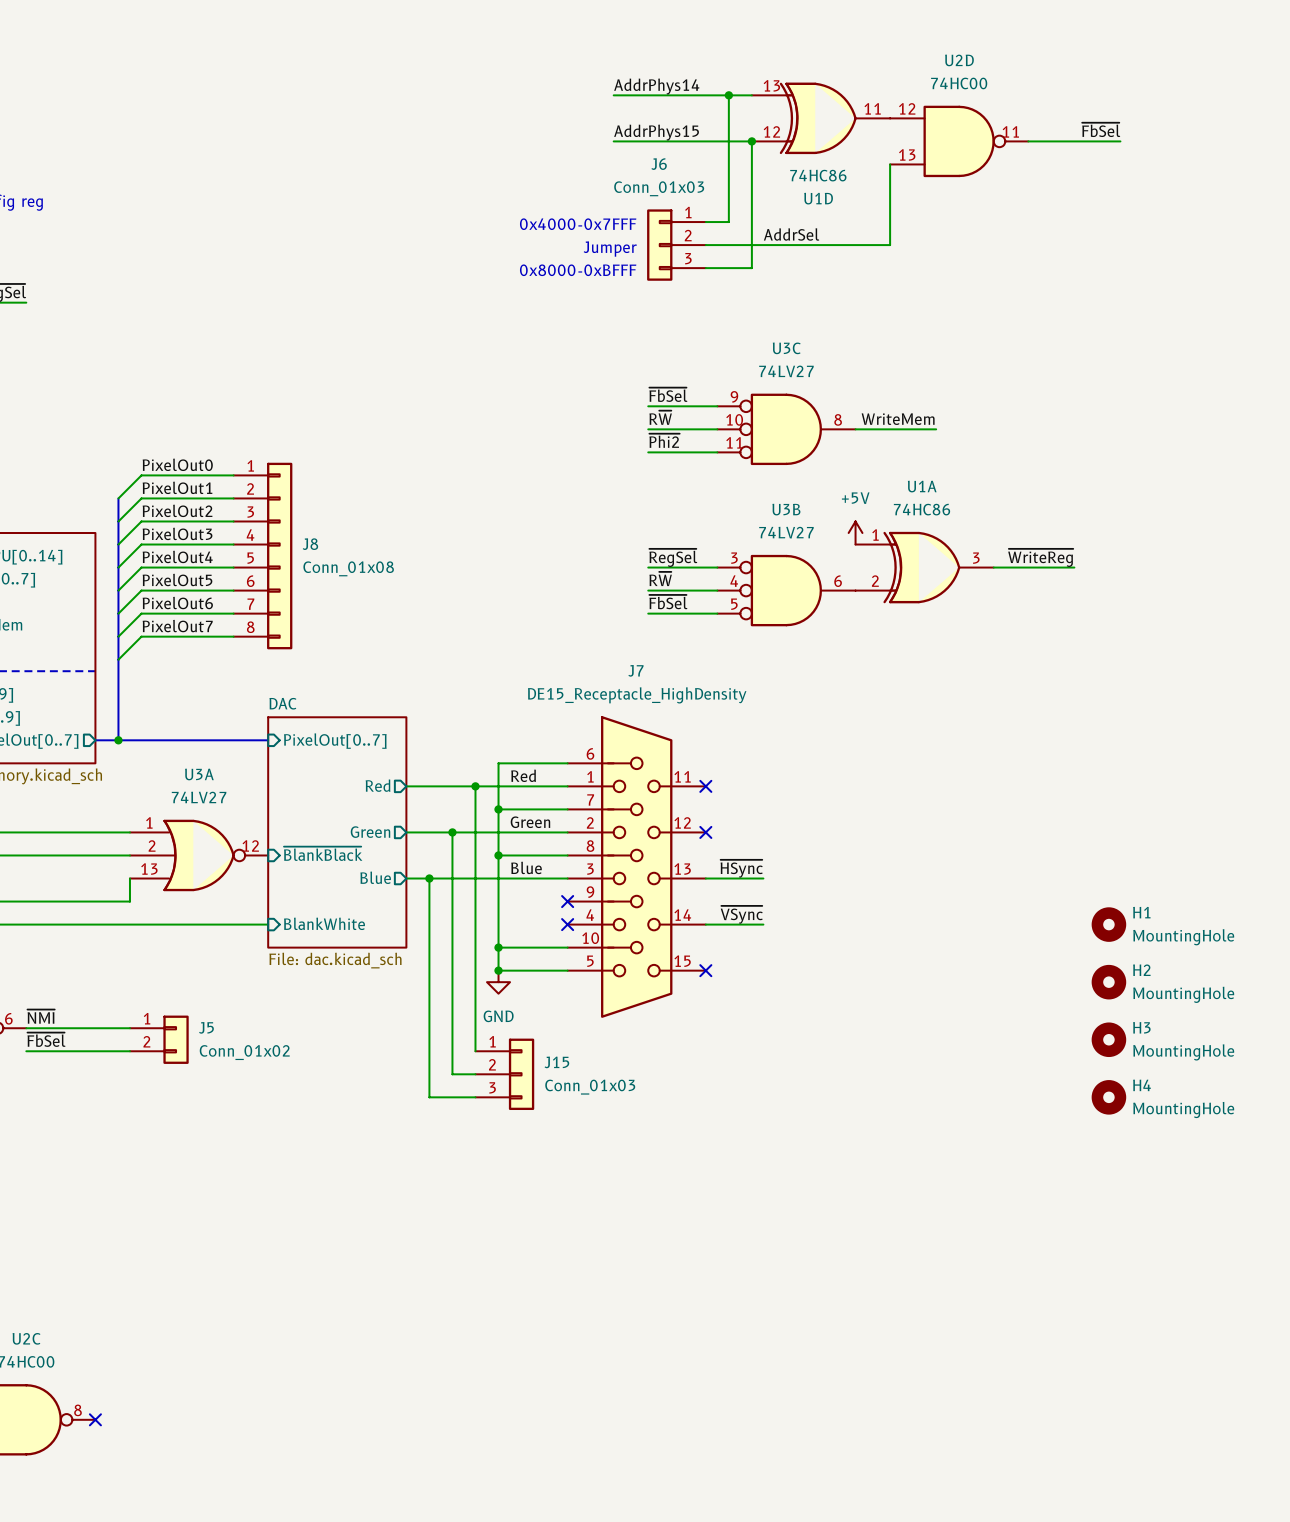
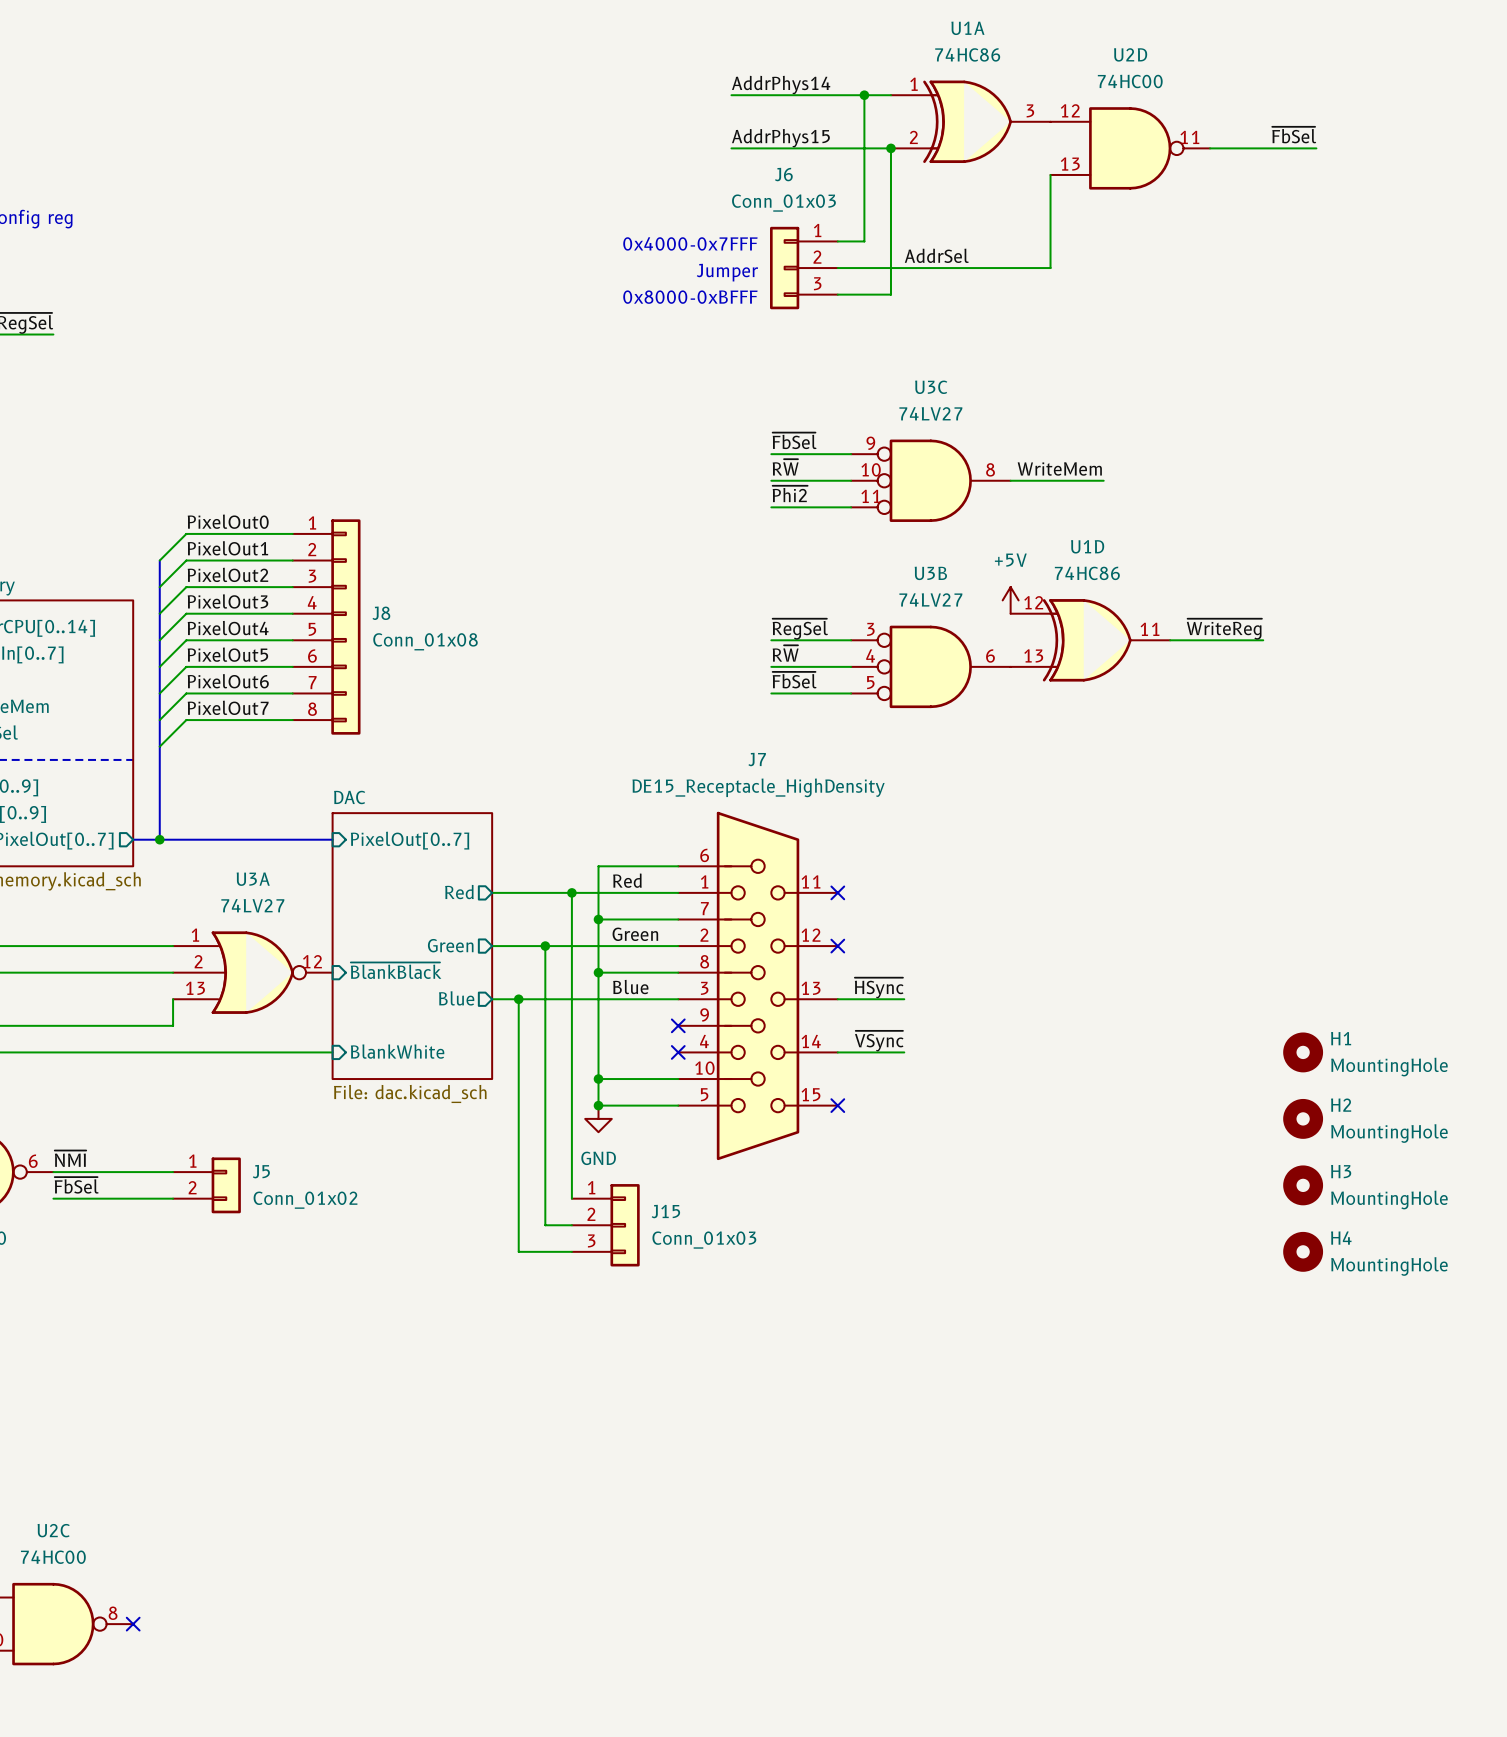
U1D flip: as is (818, 118) -> up-down (1087, 640)
U1D position: (821, 118) -> (1090, 640)
U1A position: (924, 567) -> (970, 121)

